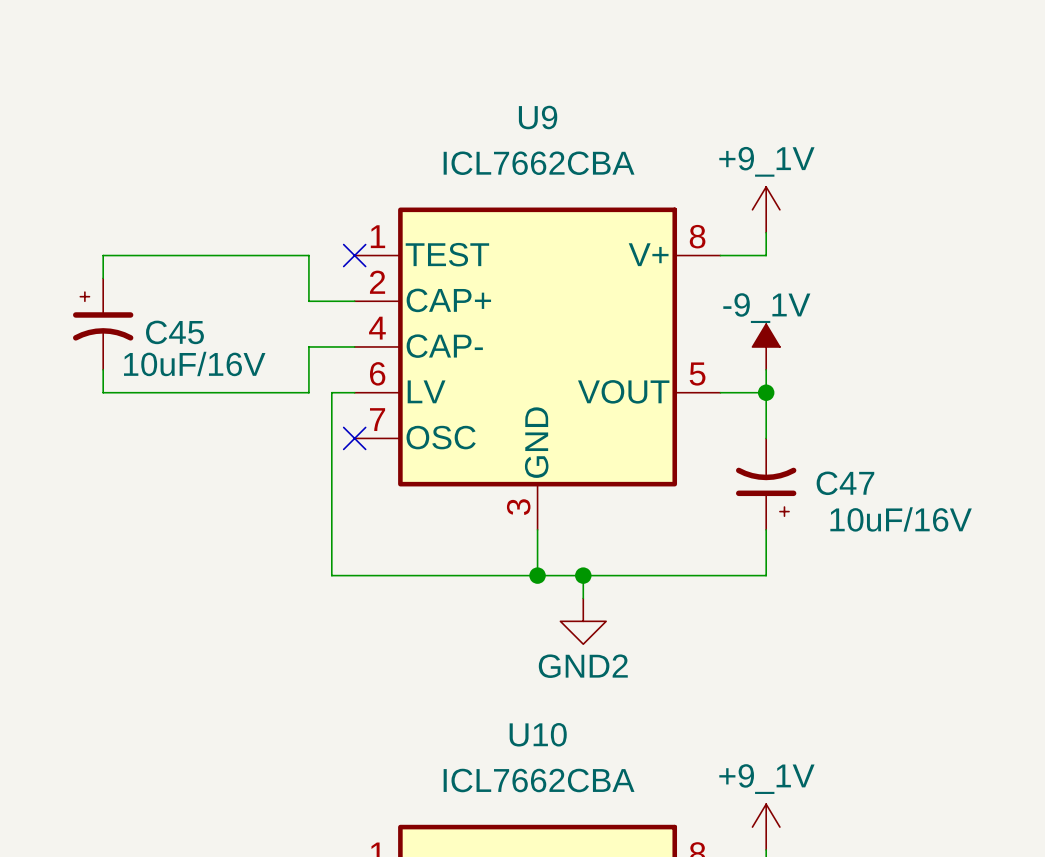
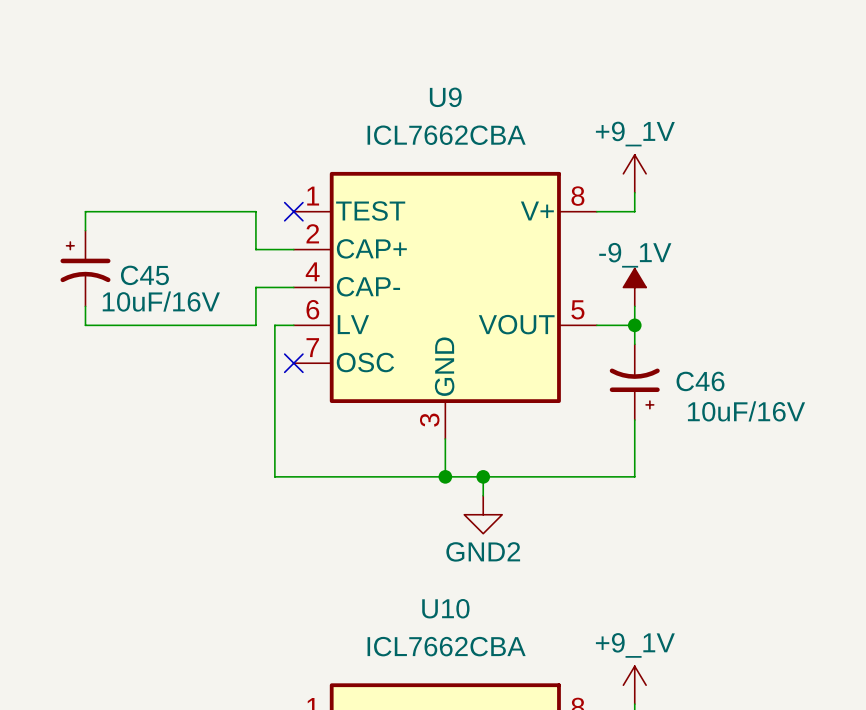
C46: none -> 10uF/16V (634, 382)
C47: 10uF/16V (766, 484) -> none

